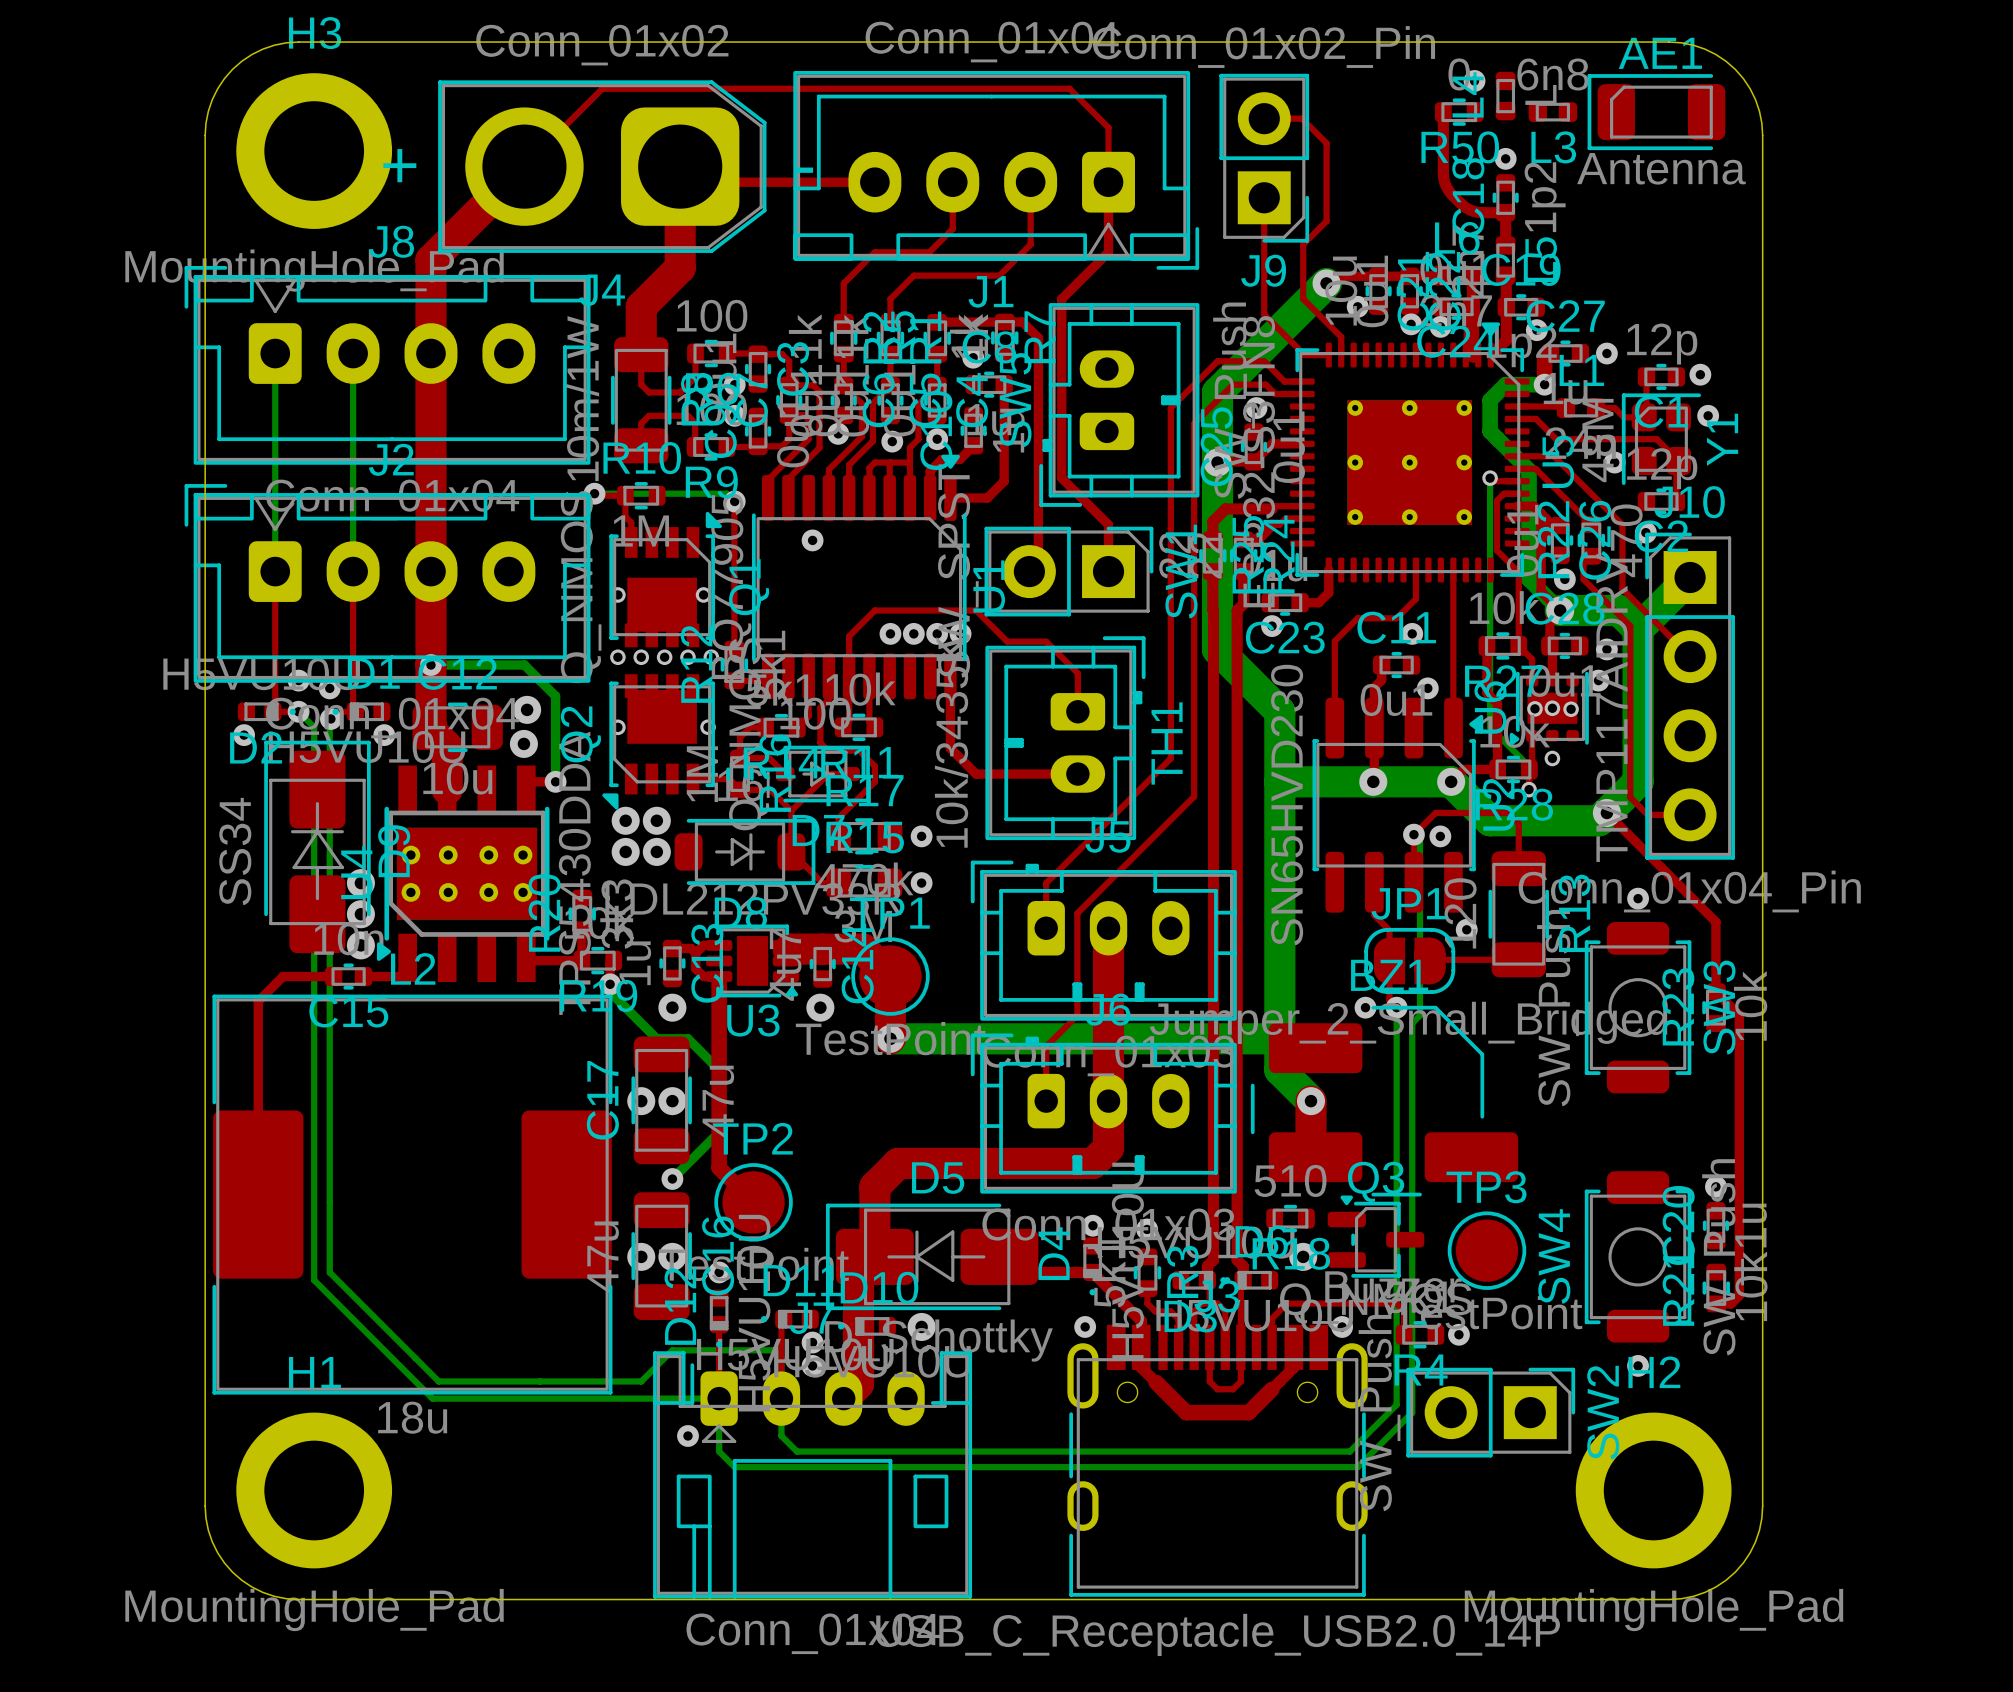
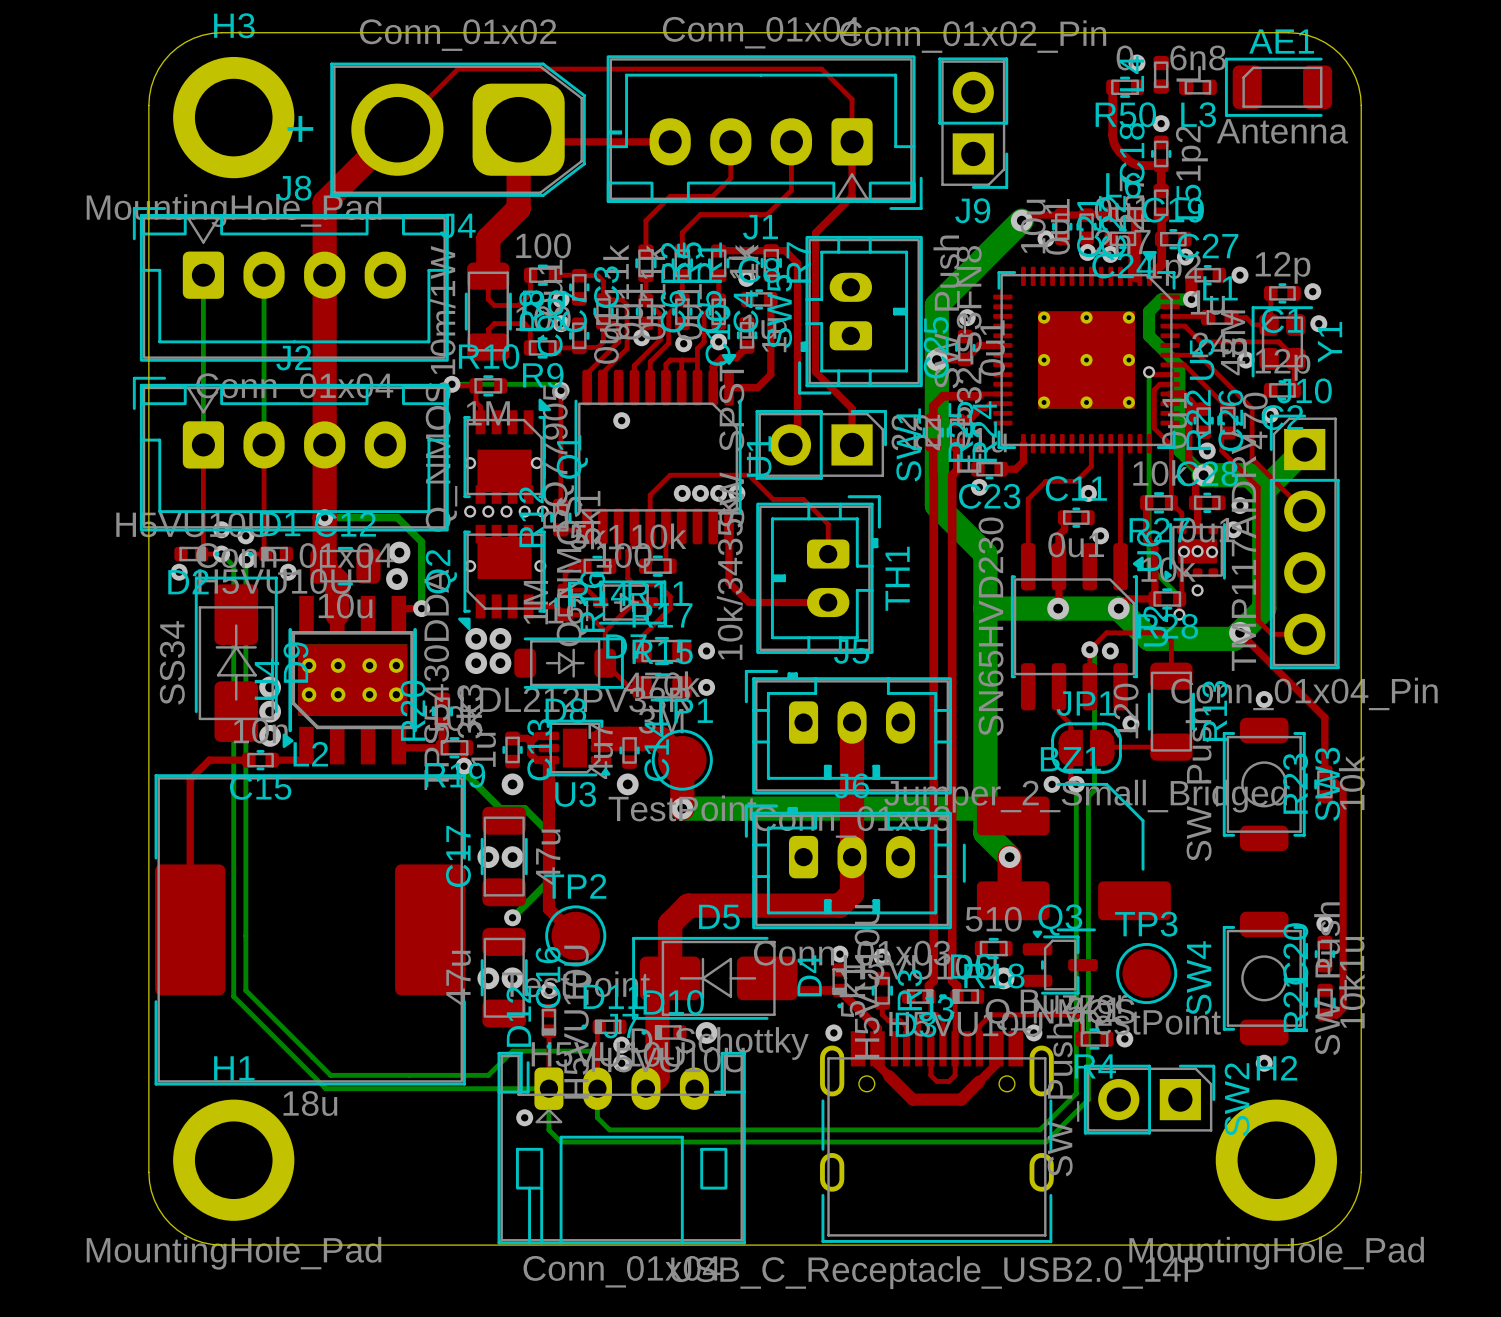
top track: (1264, 118) (1301, 118) (1326, 143) (1326, 221) (1303, 244) (1303, 299) (1341, 337) (1341, 355) -> none
top track: (1264, 197) (1264, 314) (1304, 355) (1328, 355) -> none
top track: (1302, 381) (1284, 381) (1264, 361) (1217, 361) (1170, 408) (1170, 758) (1046, 883) (1046, 928) -> none
top track: (1302, 394) (1275, 394) (1265, 384) (1233, 384) (1194, 423) (1194, 796) (1077, 913) (1077, 1015) (1046, 1046) (1046, 1101) -> none

